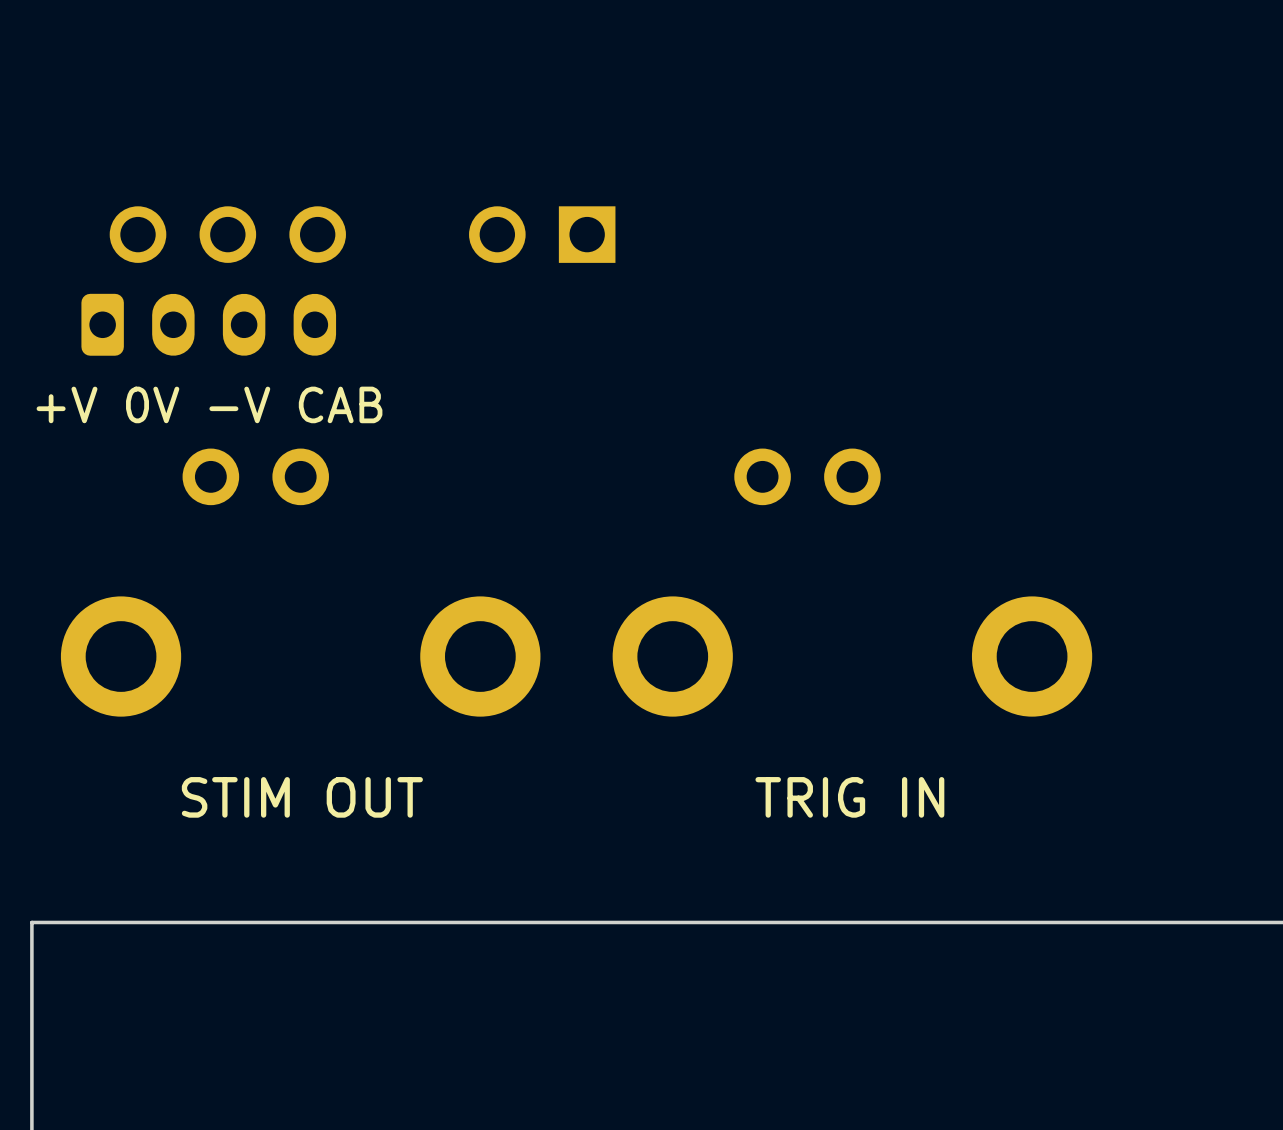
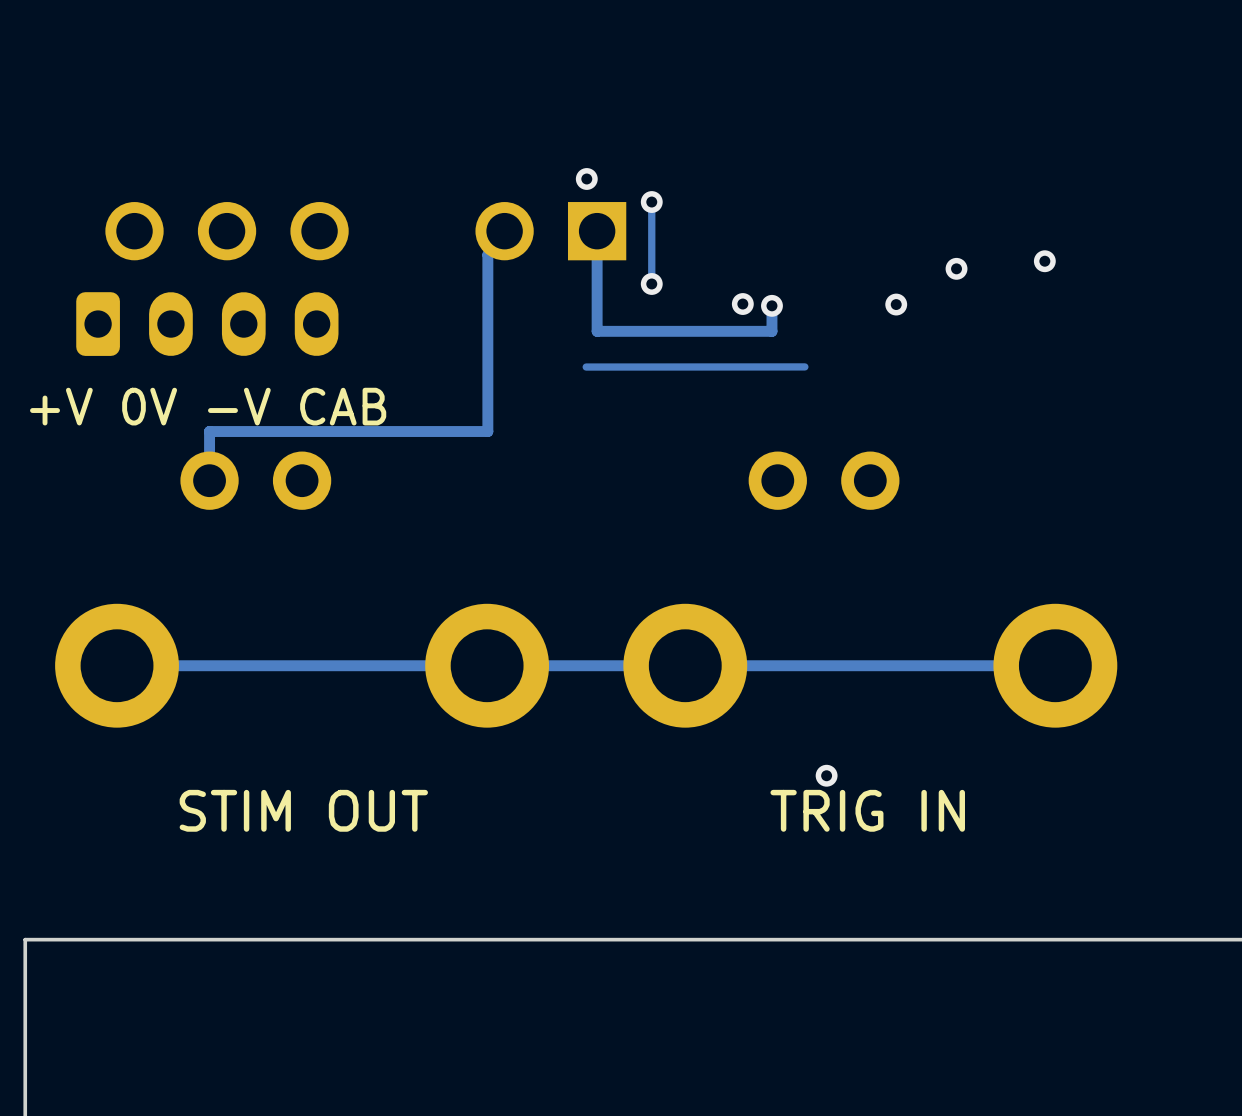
via: none -> (586, 178)
track: none -> (651, 202) (651, 283)
via: none -> (651, 202)
track: none -> (597, 231) (597, 331) (771, 331) (771, 305)
track: none -> (504, 238) (487, 254) (487, 431) (209, 431) (209, 480)
via: none -> (1044, 261)
via: none -> (956, 268)
via: none -> (651, 283)
via: none -> (742, 304)
via: none -> (896, 304)
via: none -> (771, 305)
track: none -> (804, 366) (586, 367)
track: none -> (1055, 665) (117, 665)
via: none -> (826, 775)

